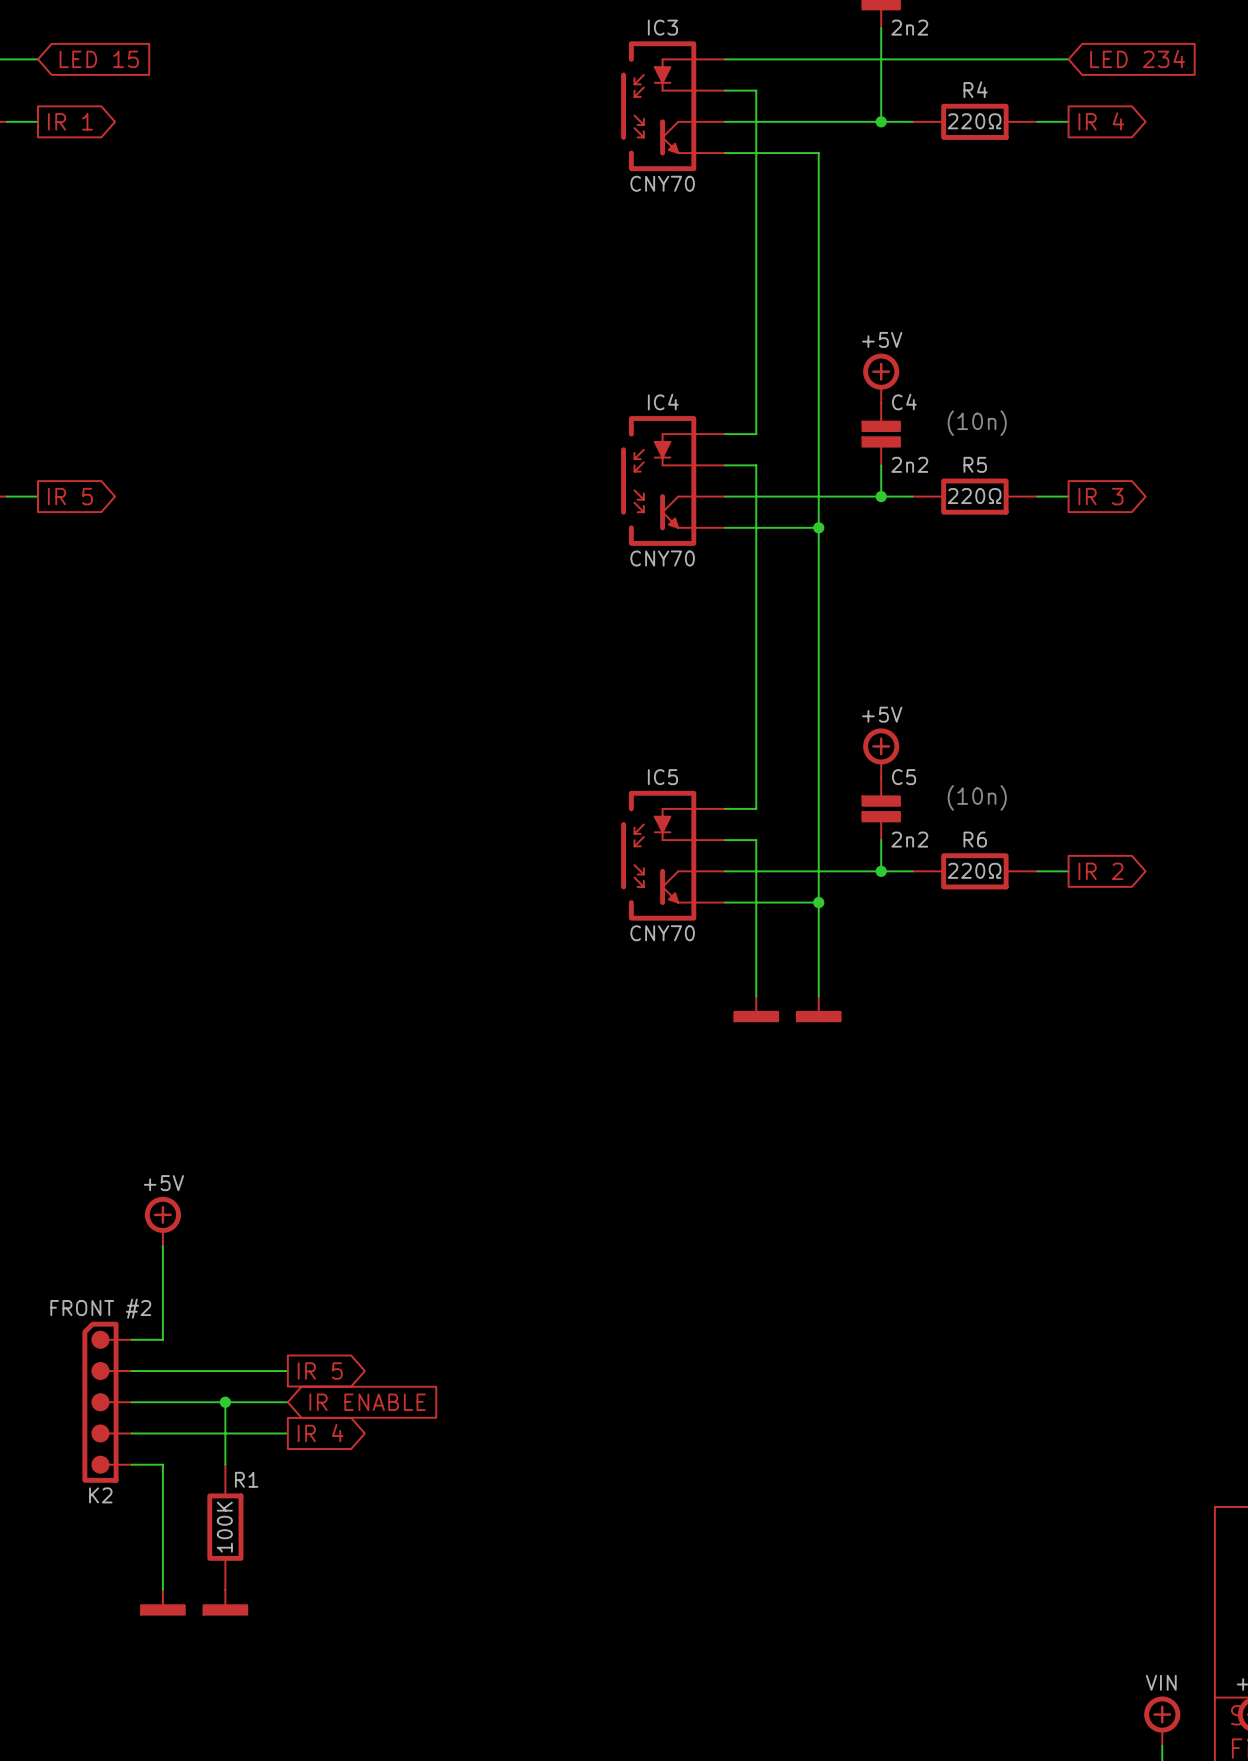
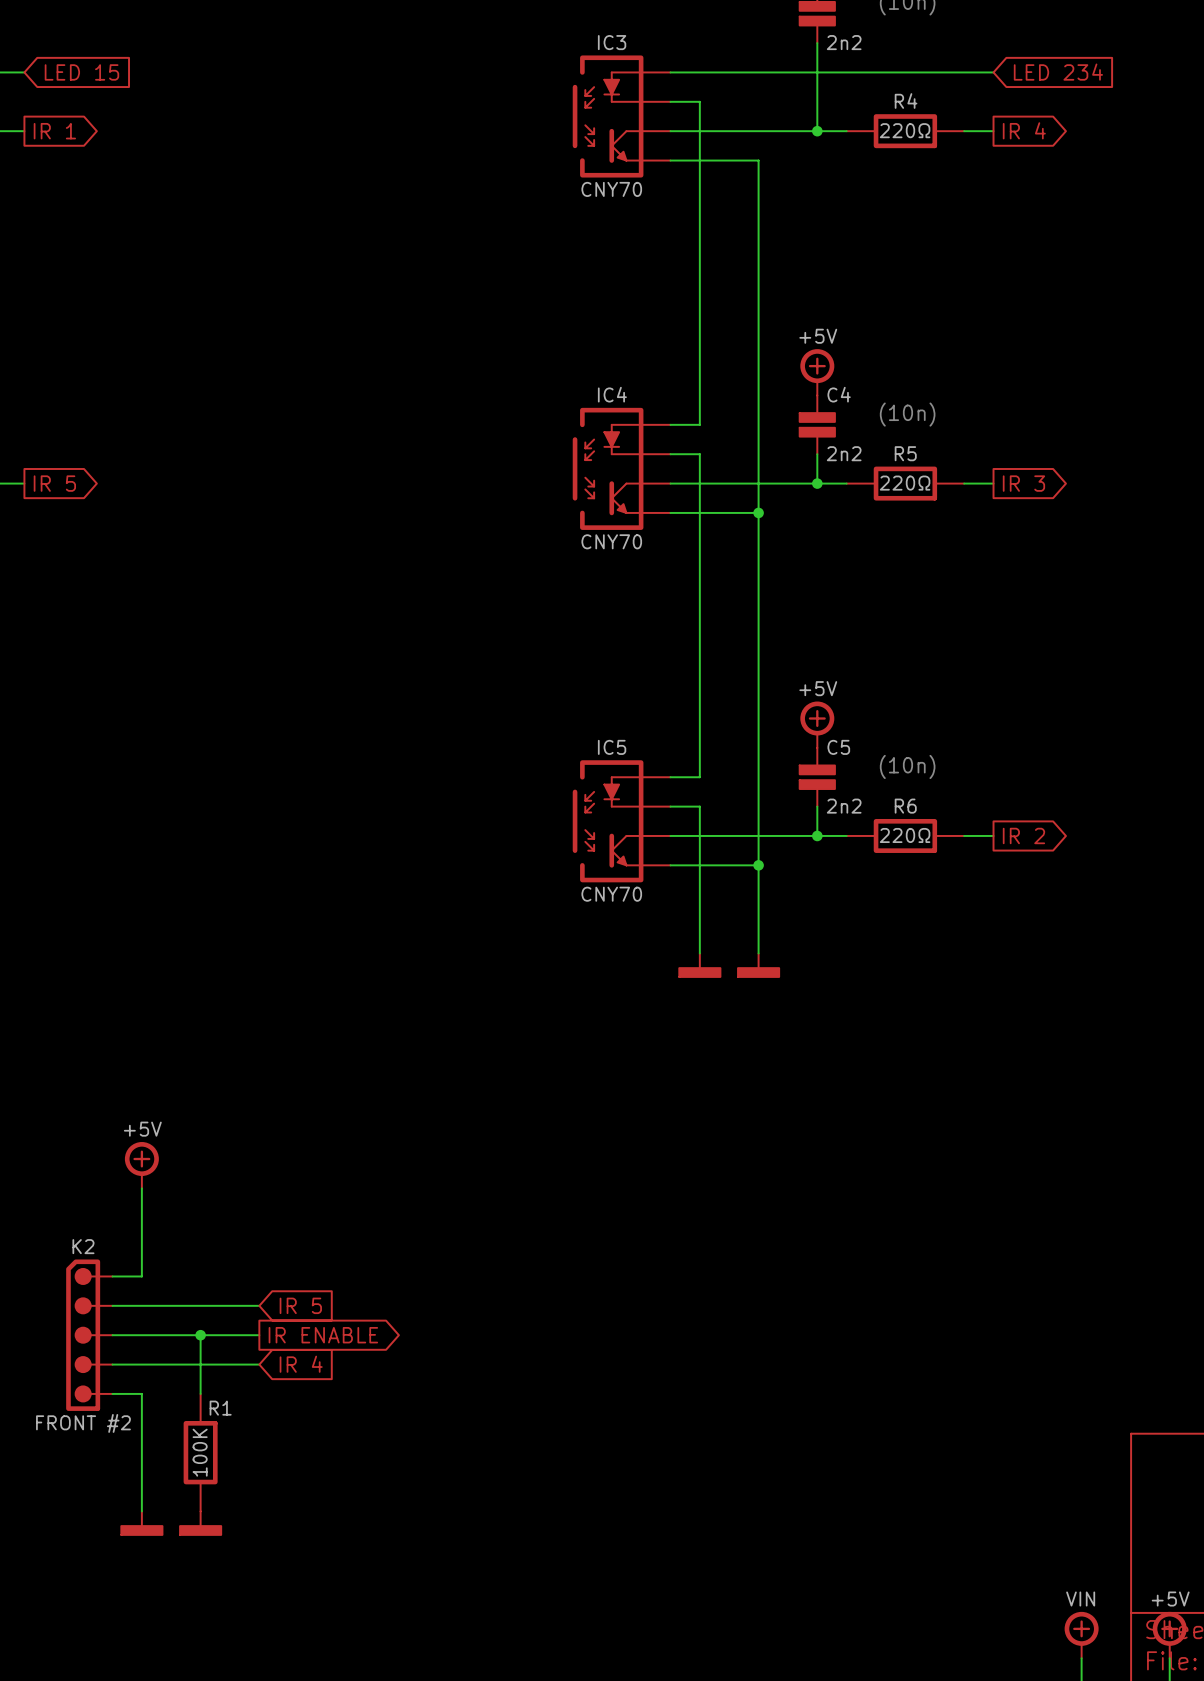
K2 value position: FRONT #2 (100, 1308) -> FRONT #2 (83, 1423)
global label shape: output (320, 1371) -> input (300, 1305)
global label shape: input (367, 1402) -> output (323, 1335)
global label shape: output (320, 1433) -> input (301, 1364)
K2 name position: K2 (100, 1495) -> K2 (83, 1246)

